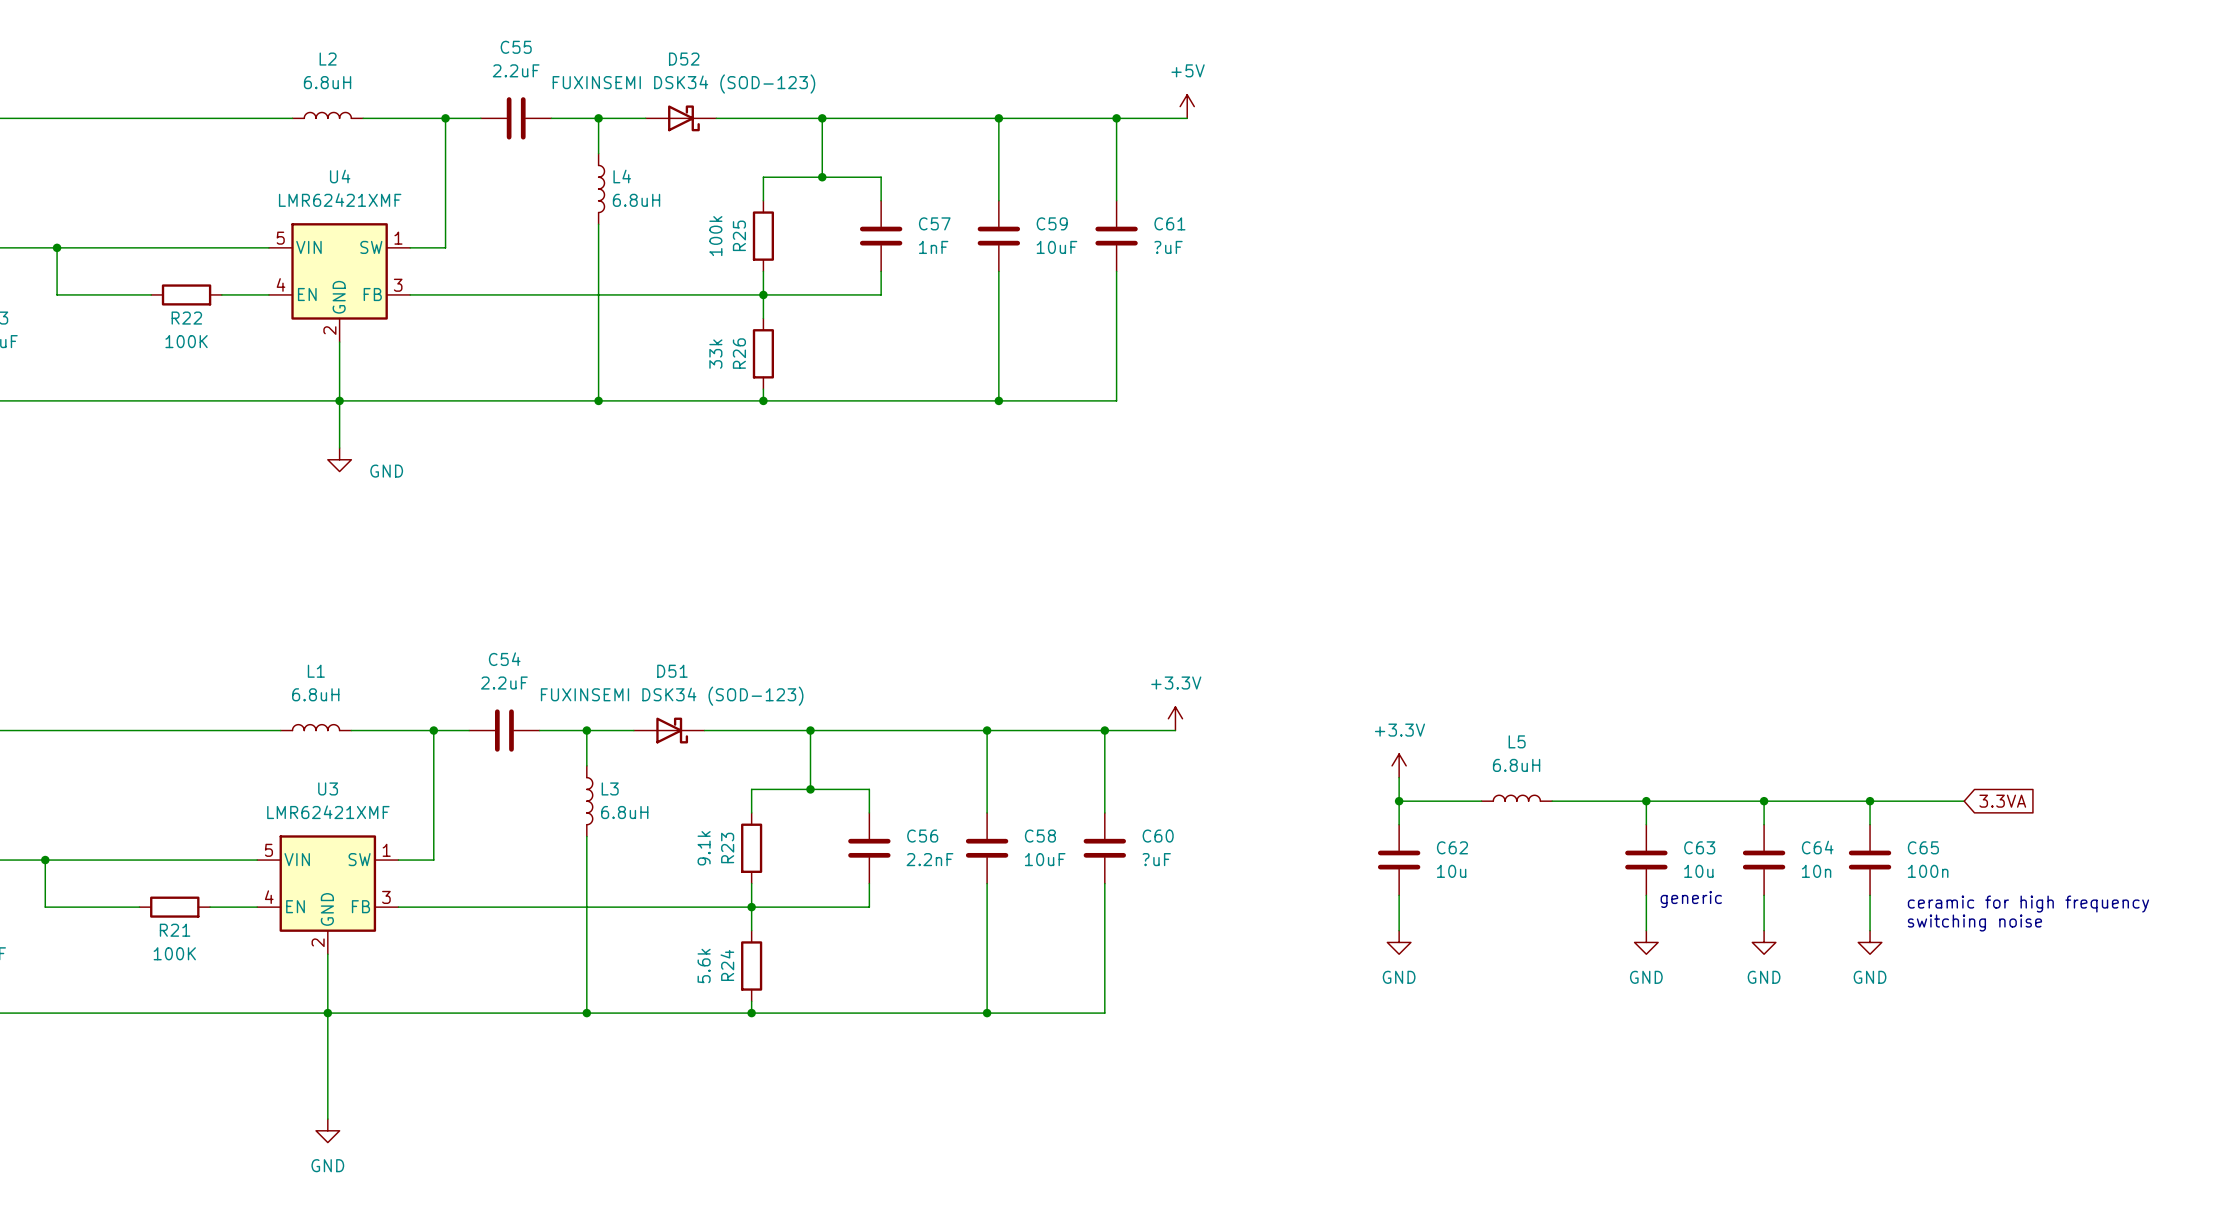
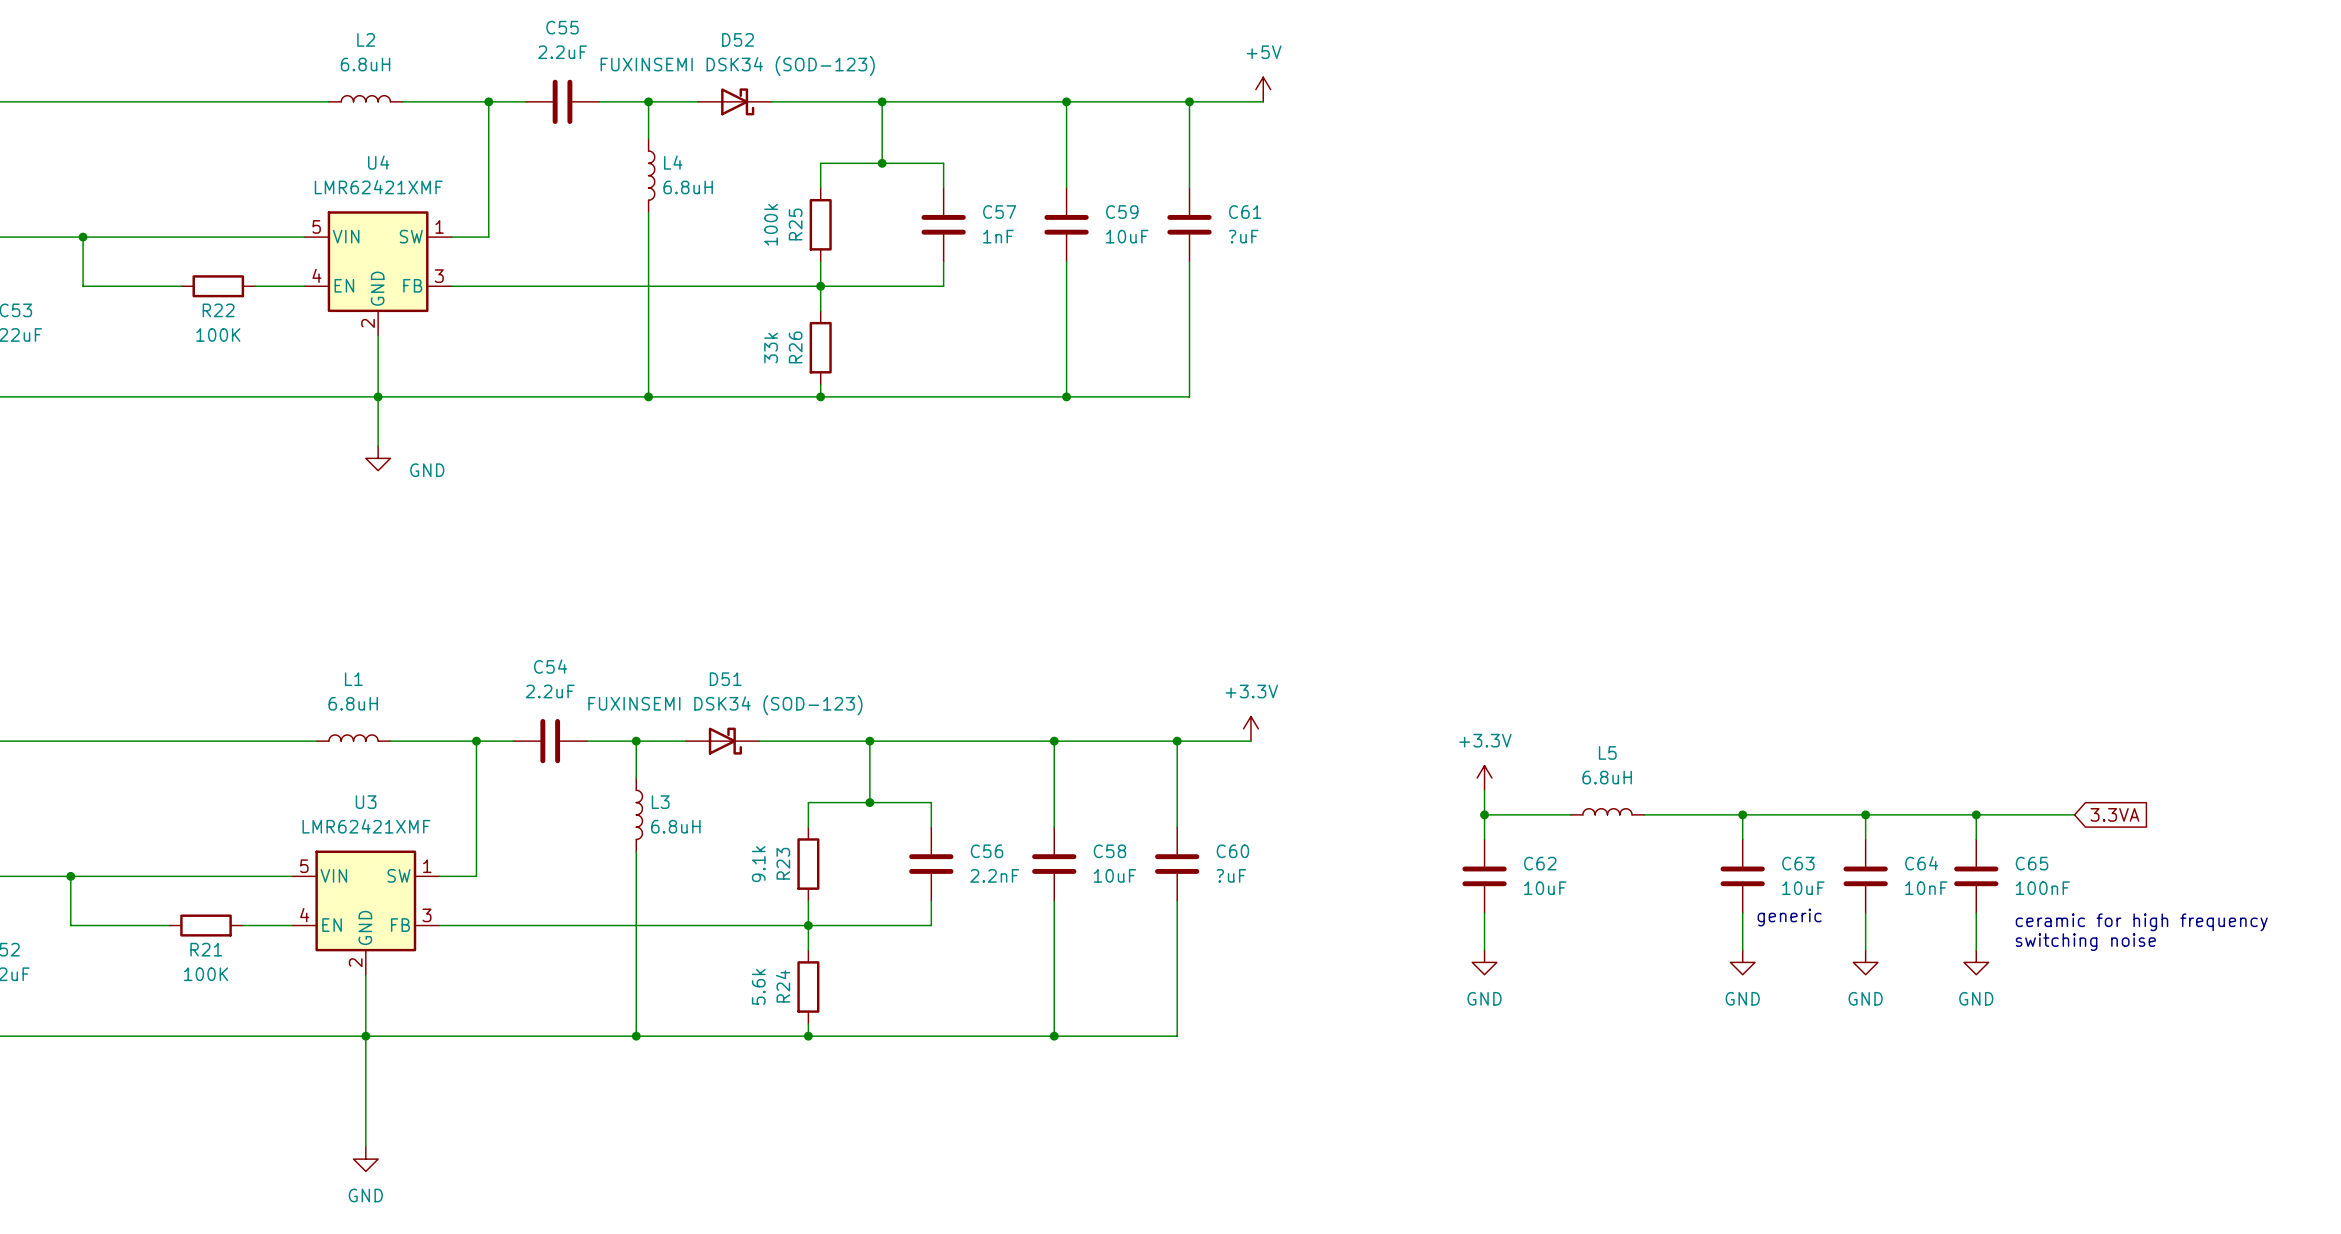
C62 value: 10u (1451, 871) -> 10uF (1545, 888)
C63 value: 10u (1698, 871) -> 10uF (1803, 888)
C64 value: 10n (1816, 871) -> 10nF (1926, 888)
C65 value: 100n (1928, 871) -> 100nF (2042, 888)

